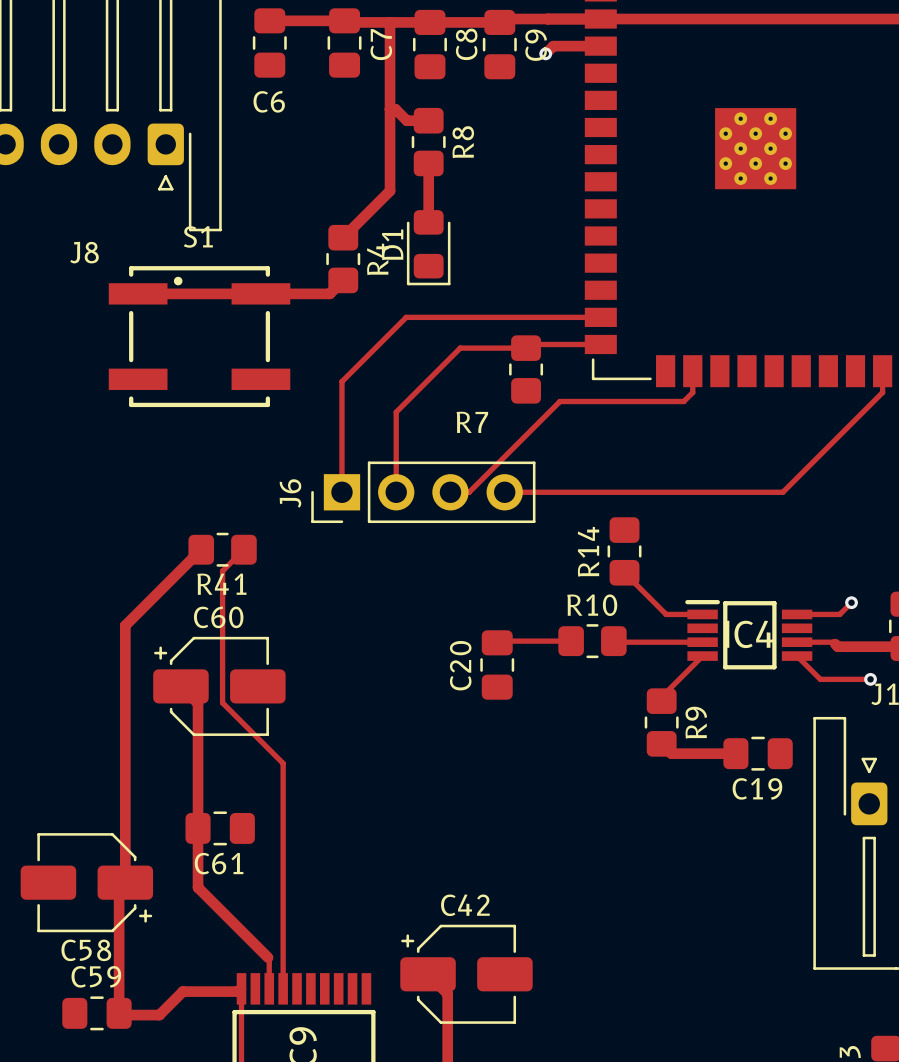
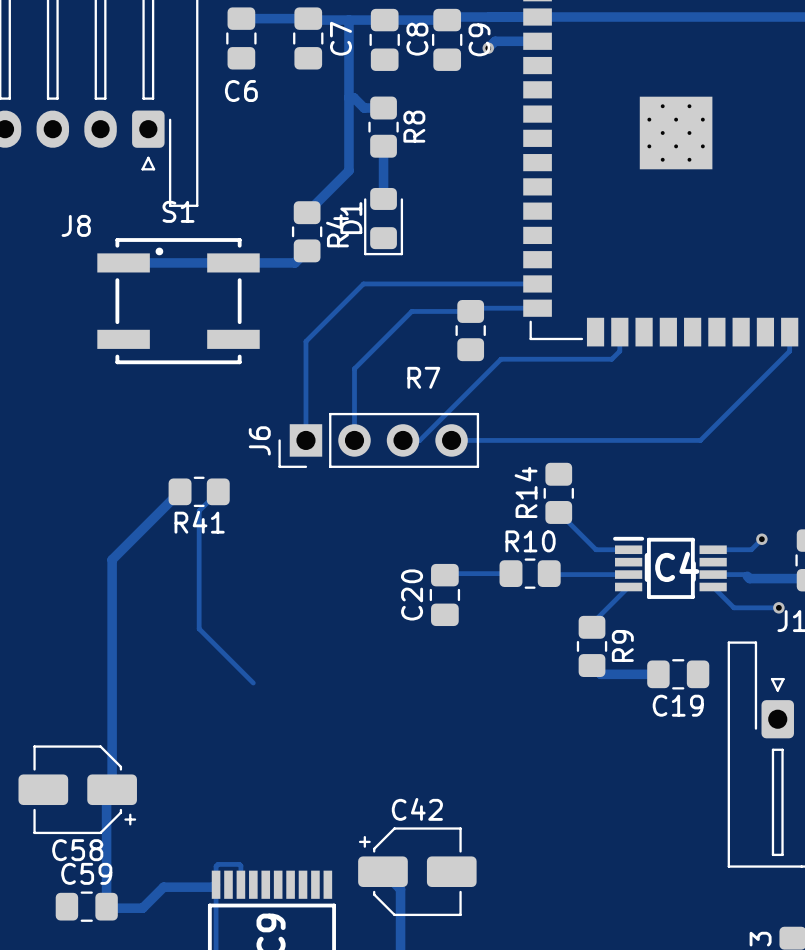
track: (180, 686) (198, 703) (198, 887) (269, 958) (269, 967) -> (216, 884) (216, 866) (217, 864) (240, 865)
C60: (219, 686) -> none
track: (283, 763) (283, 988) -> none
C61: (220, 828) -> none

